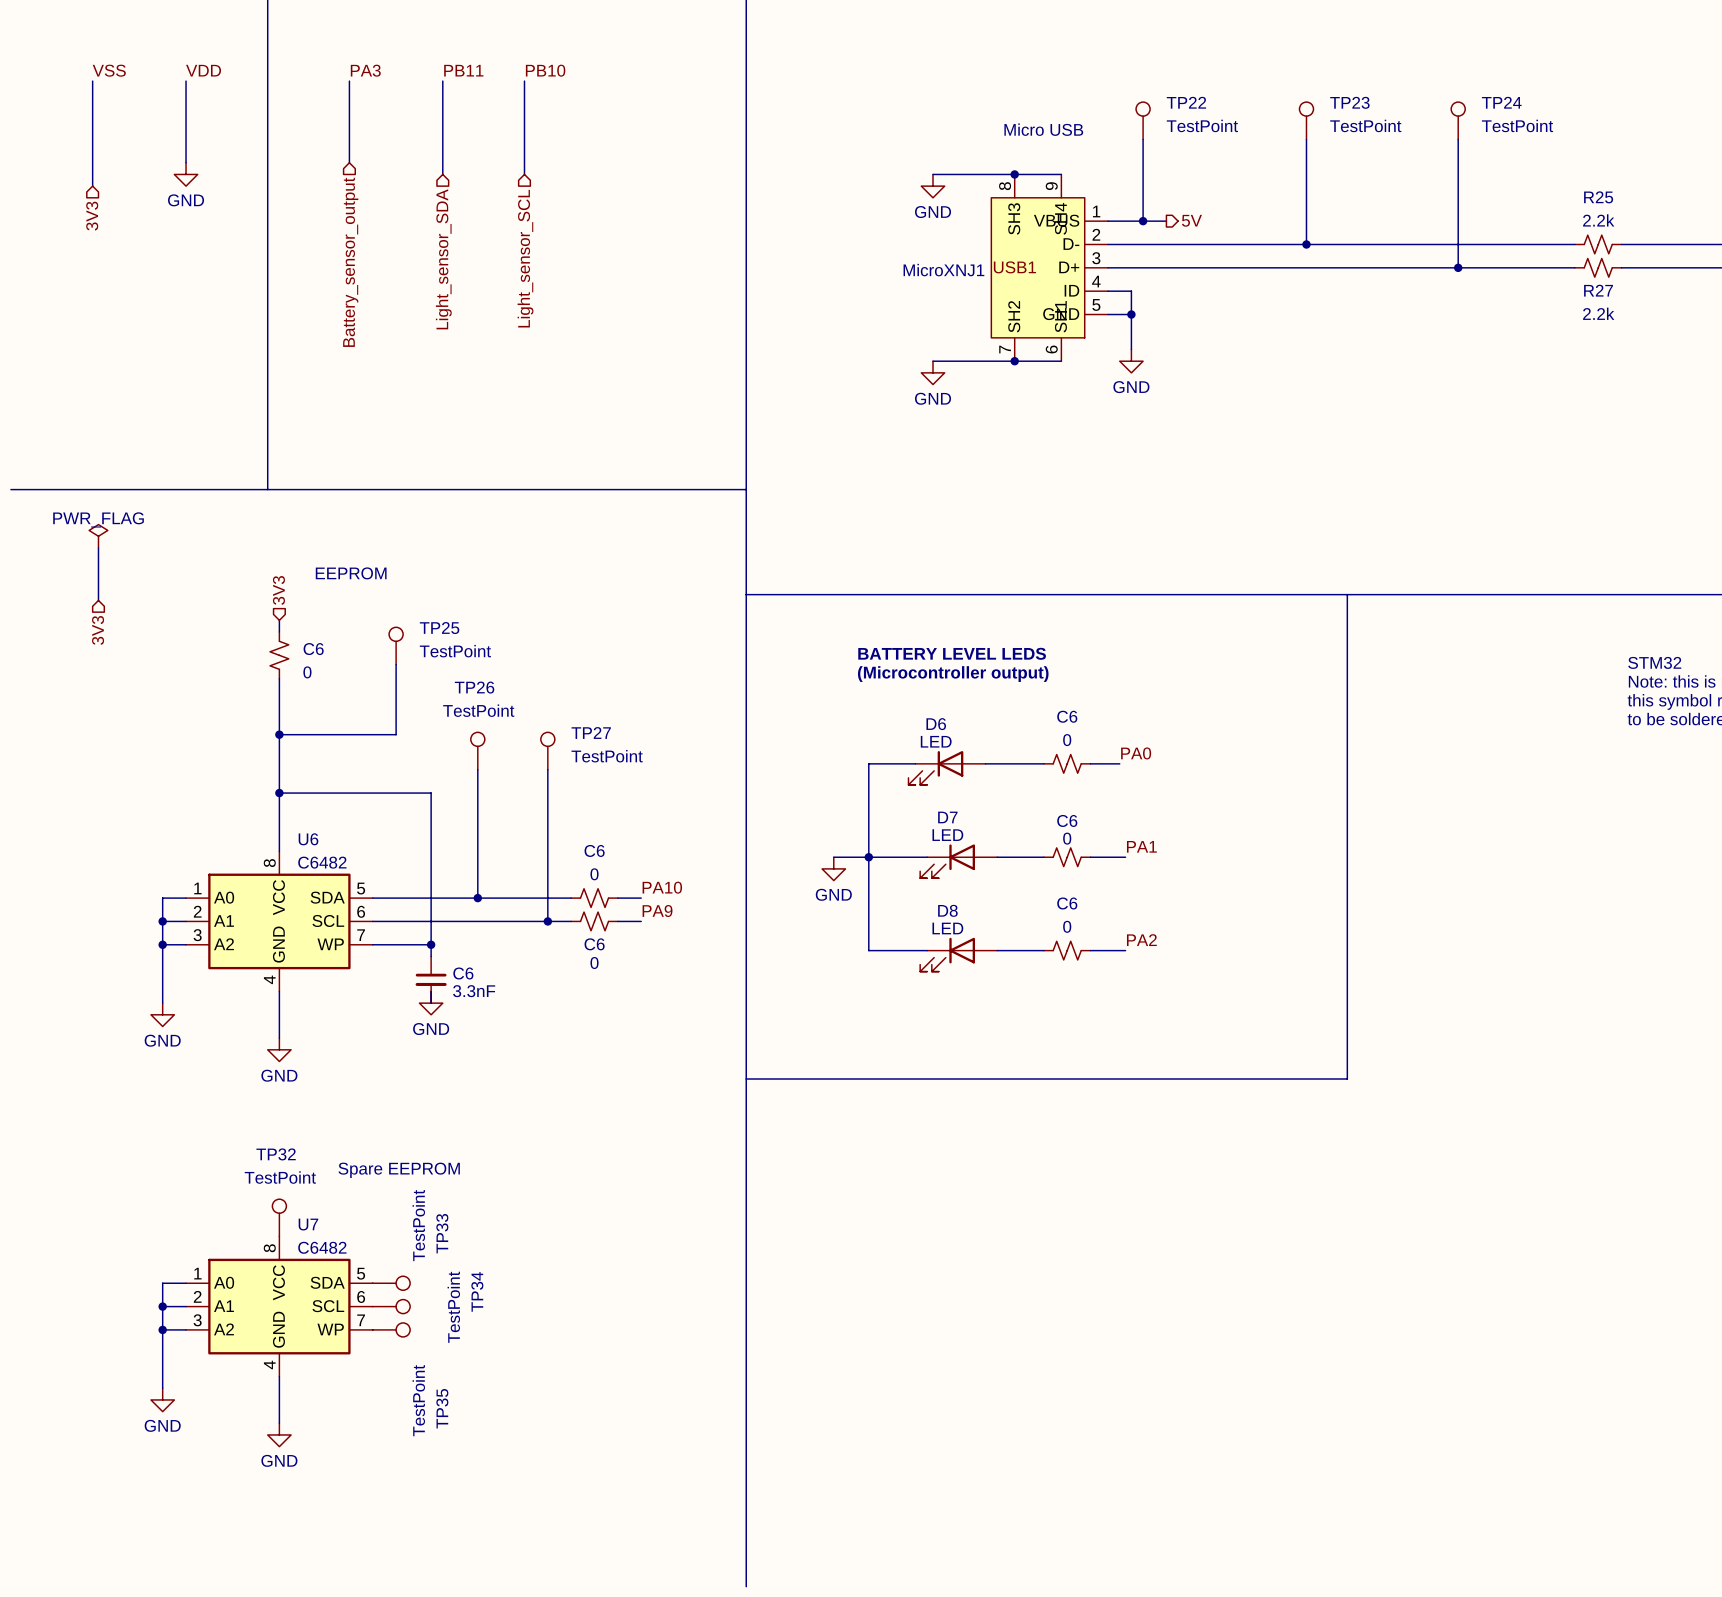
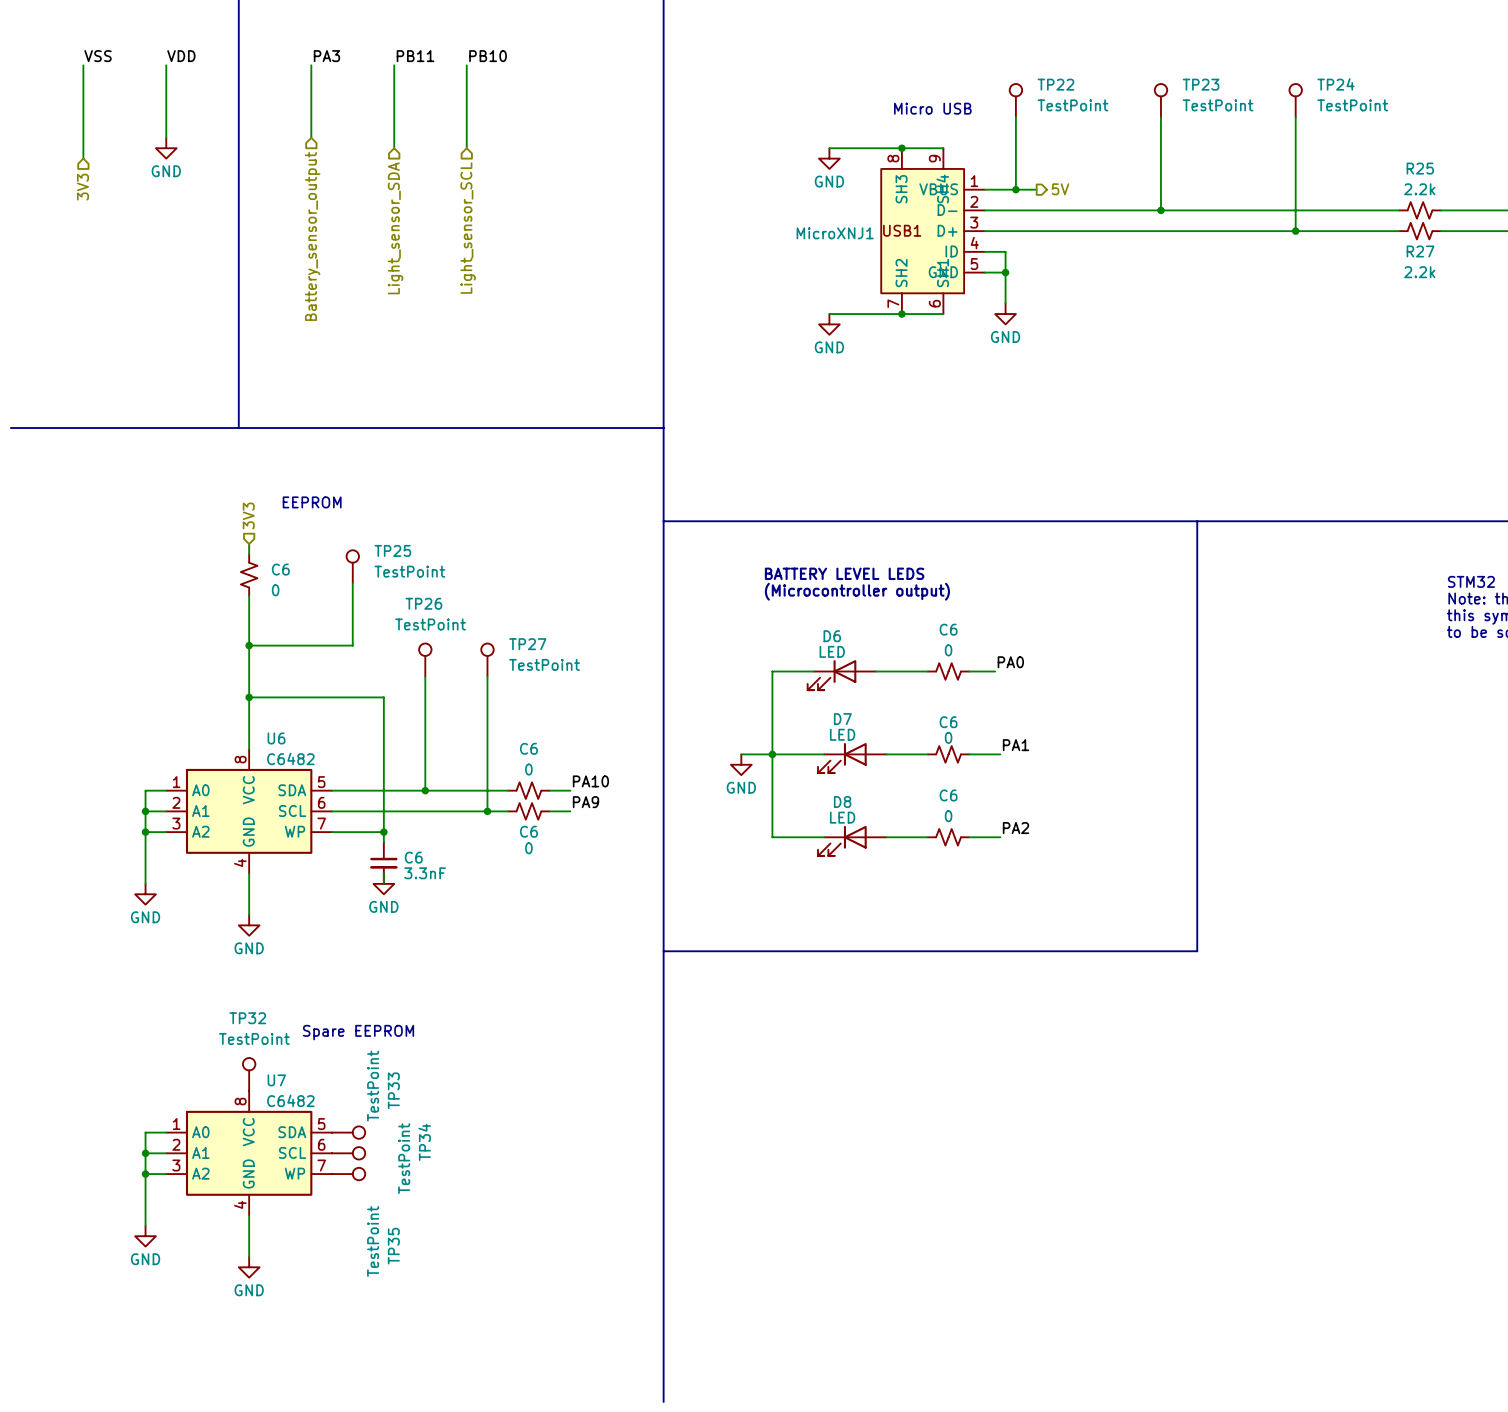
power symbol: PWR_FLAG (98, 536) -> none
wire: (98, 547) (98, 600) -> none
hierarchical label: 3V3 (98, 630) -> none

